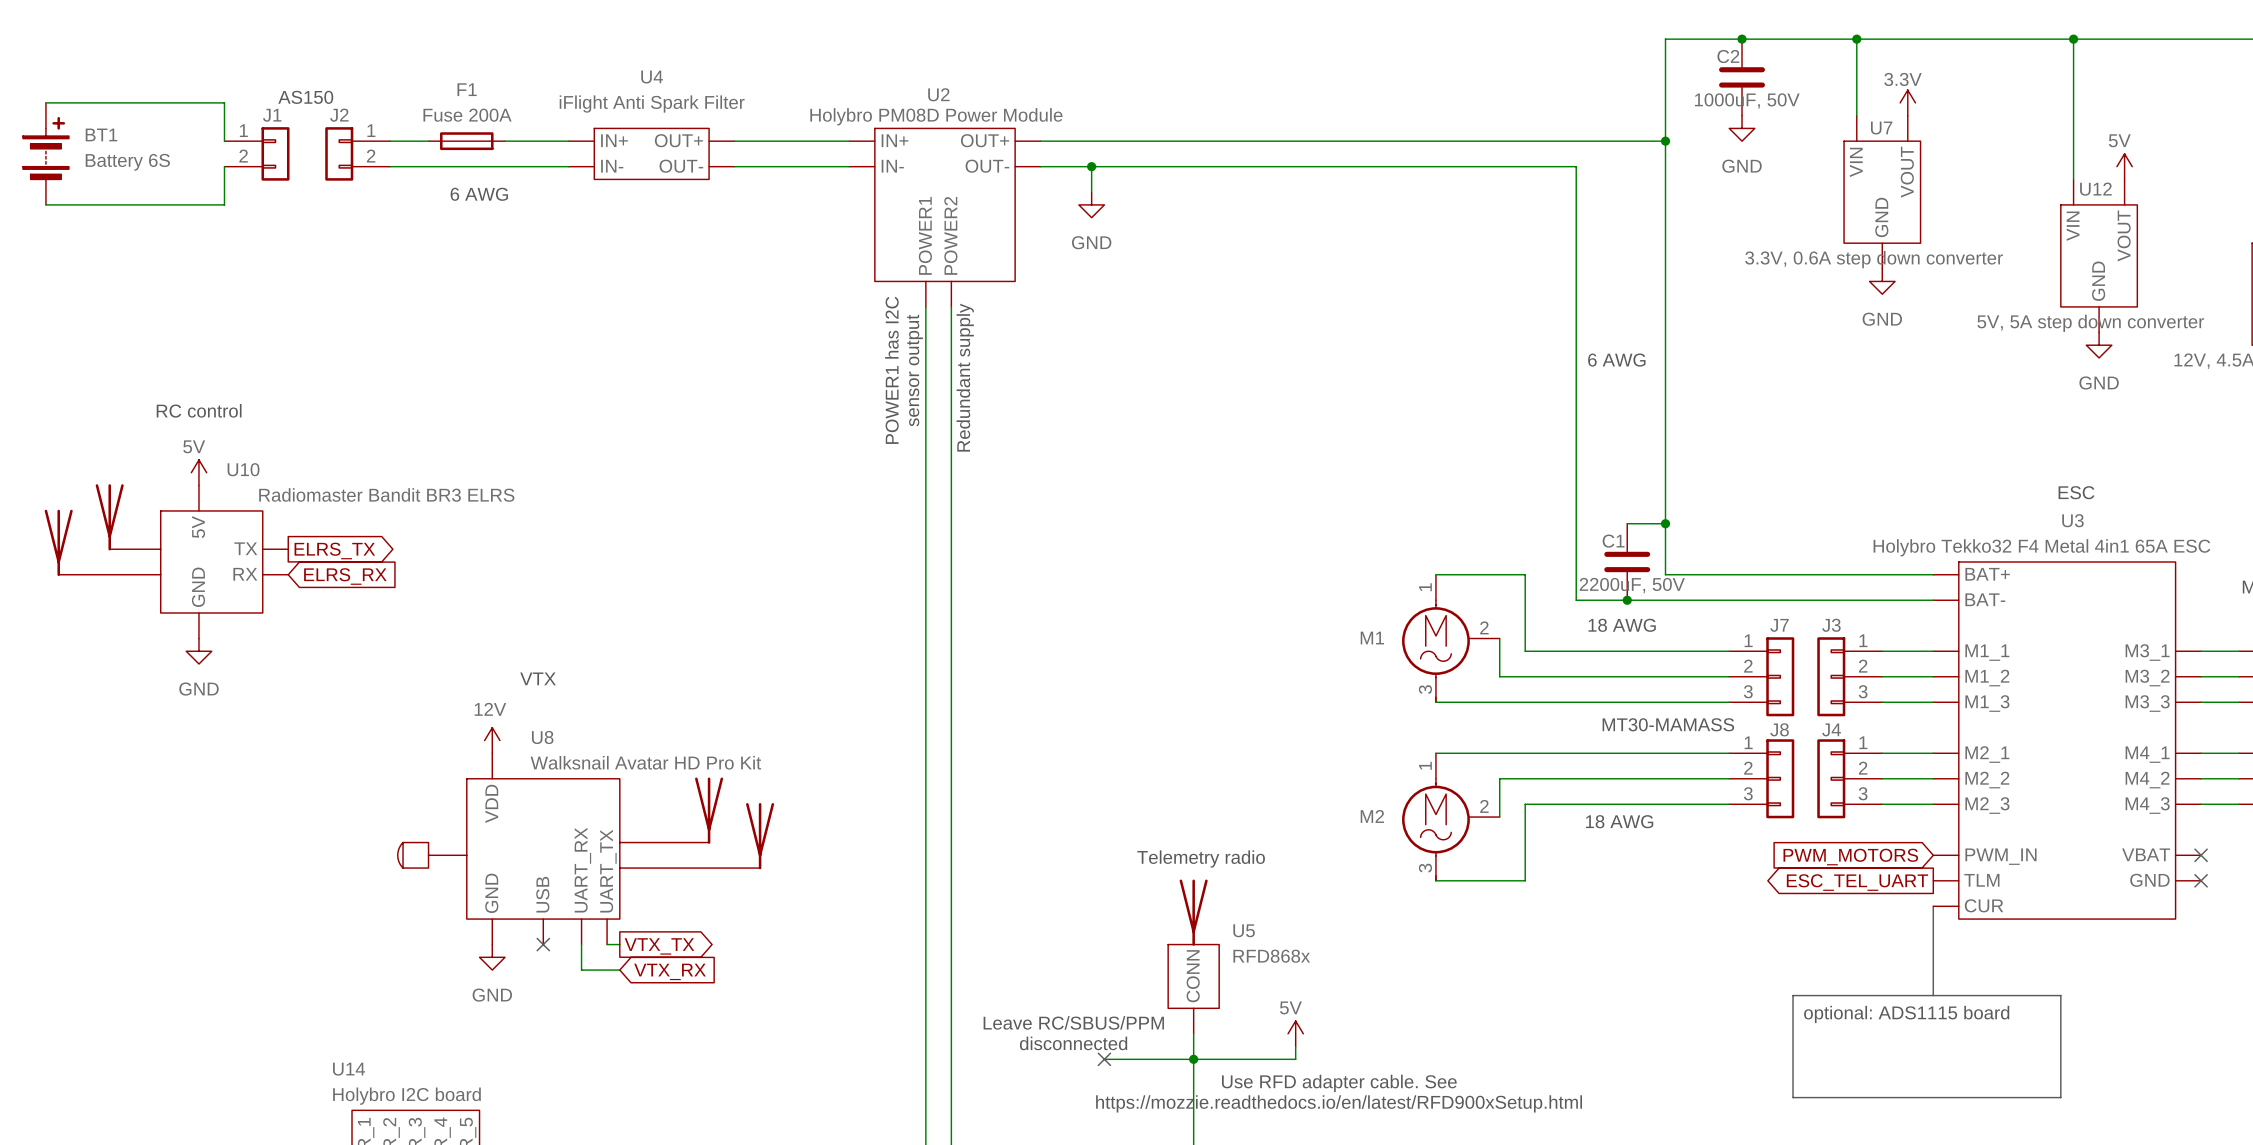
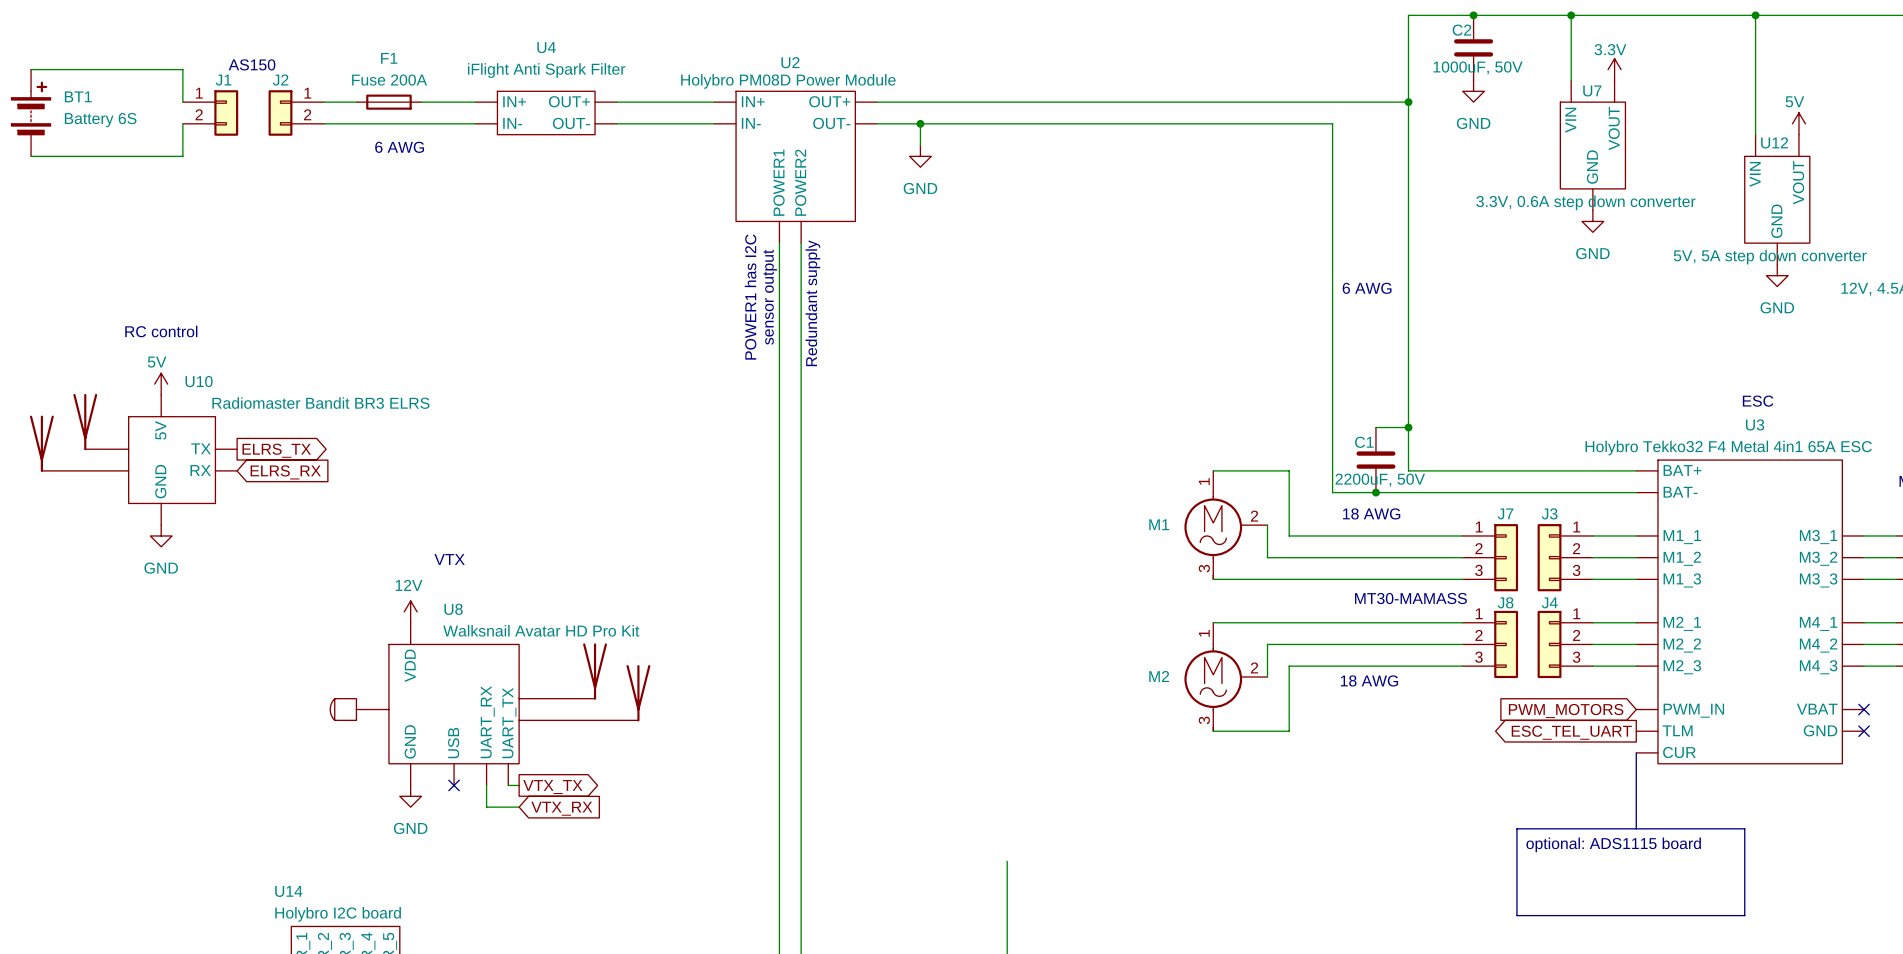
text: Telemetry radio (1201, 858) -> none
U5: RFD868x (1193, 956) -> none
text: Leave RC/SBUS/PPM (1073, 1022) -> none
power symbol: 5V (1295, 1033) -> none
text: disconnected (1073, 1043) -> none
wire: (1295, 1046) (1295, 1059) (1104, 1059) -> none
no-connect mark: (1104, 1059) -> none
junction: (1193, 1059) -> none
text: Use RFD adapter cable. See (1339, 1083) -> none
text: https://mozzie.readthedocs.io/en/latest/RFD900xSetup.html (1339, 1103) -> none

